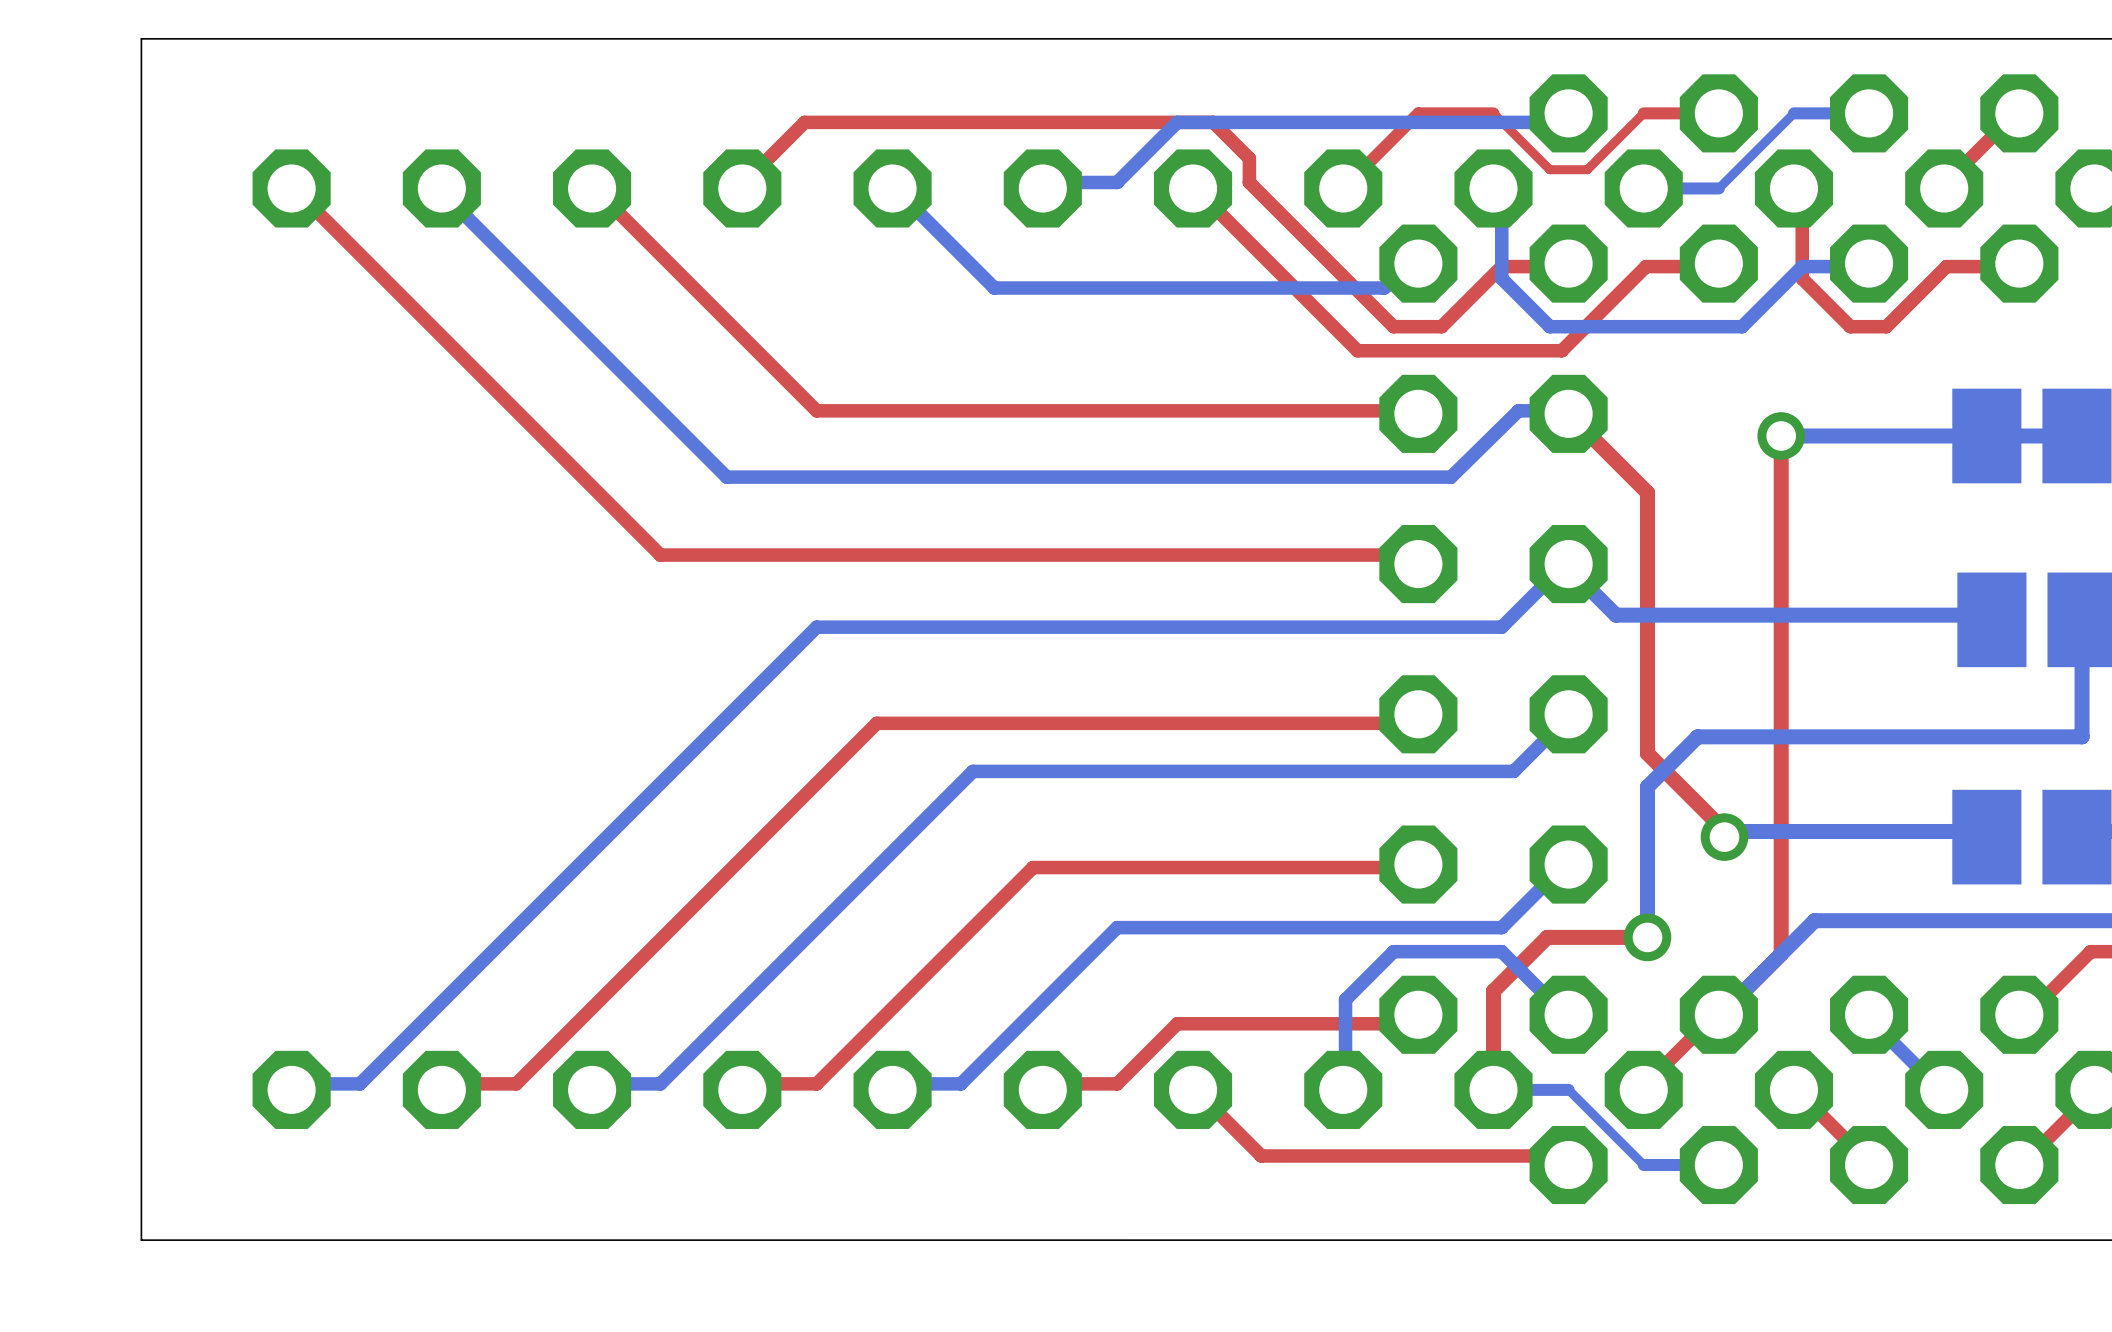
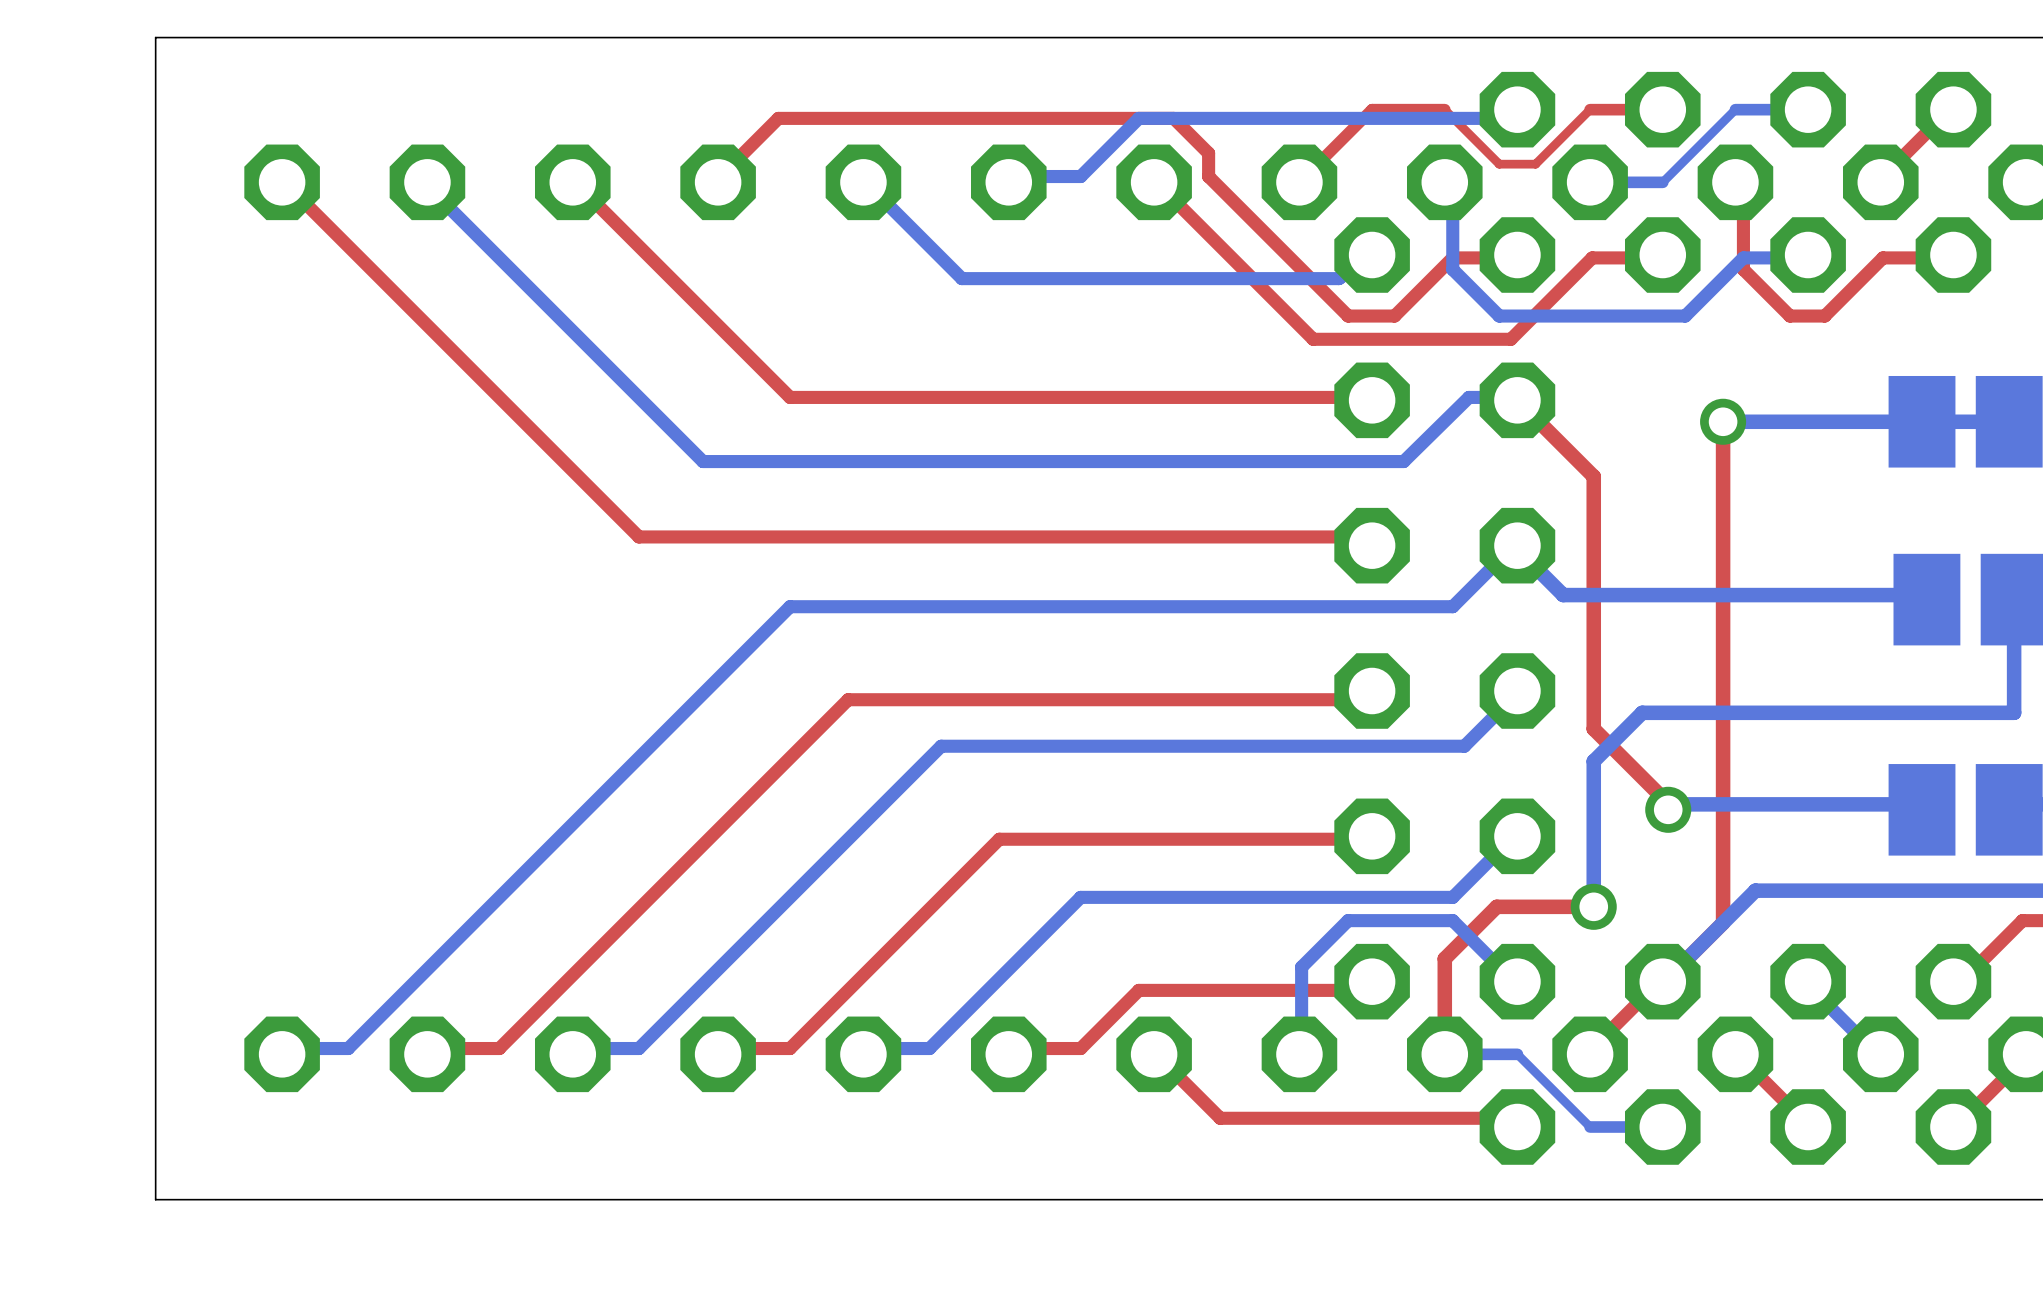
board edge: (160, 38) (141, 38) (141, 1240) (160, 1240) -> (155, 37) (155, 1199)

